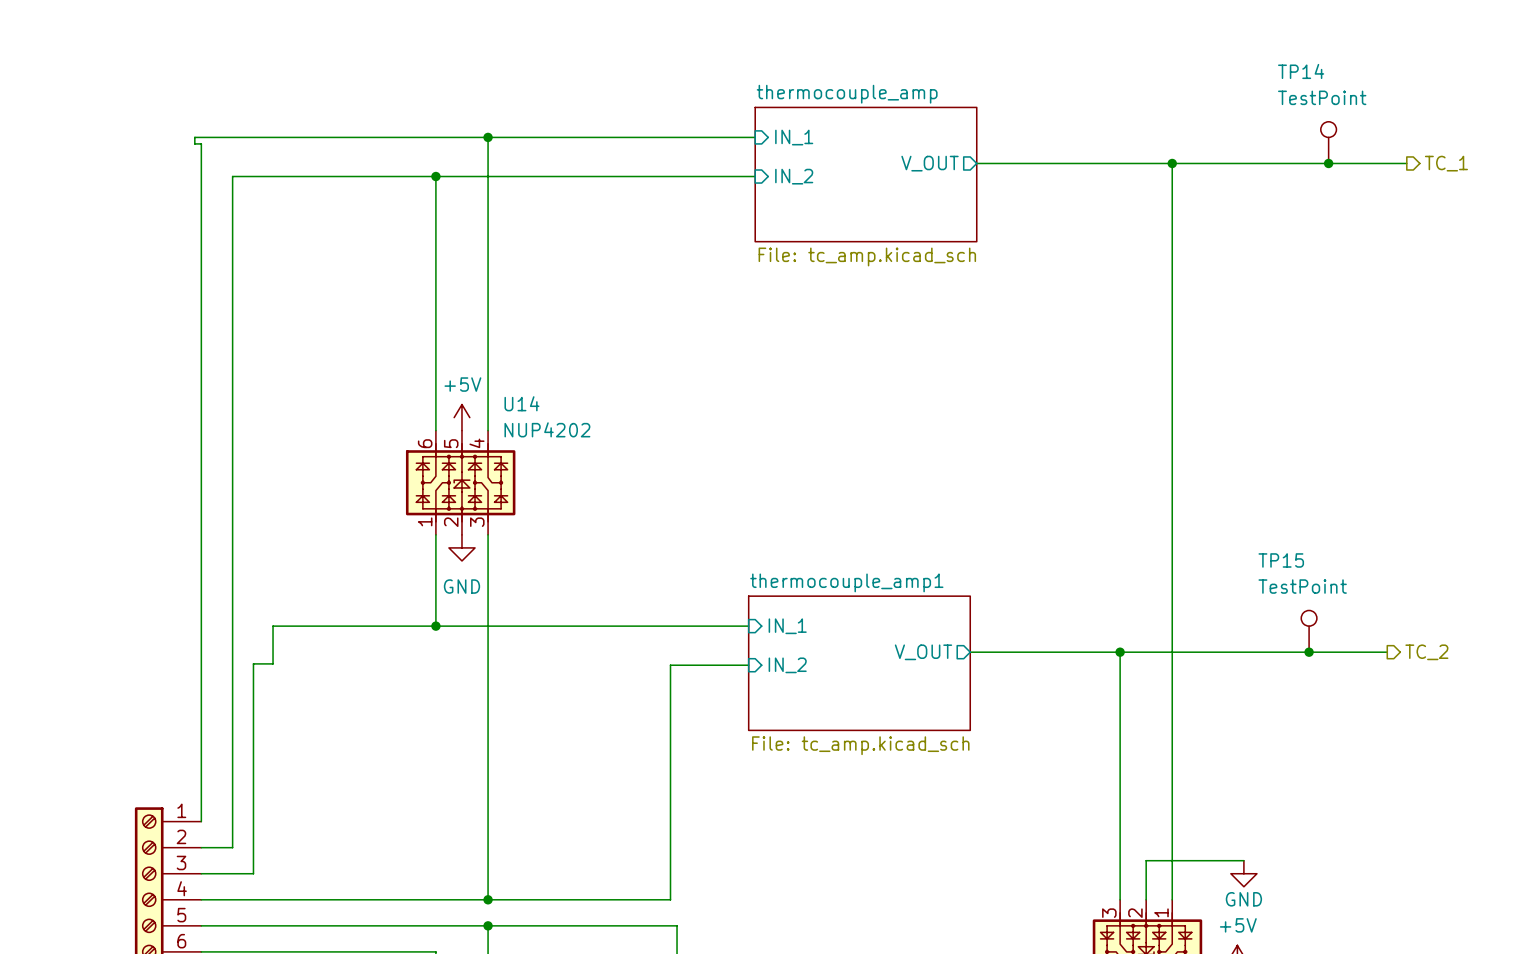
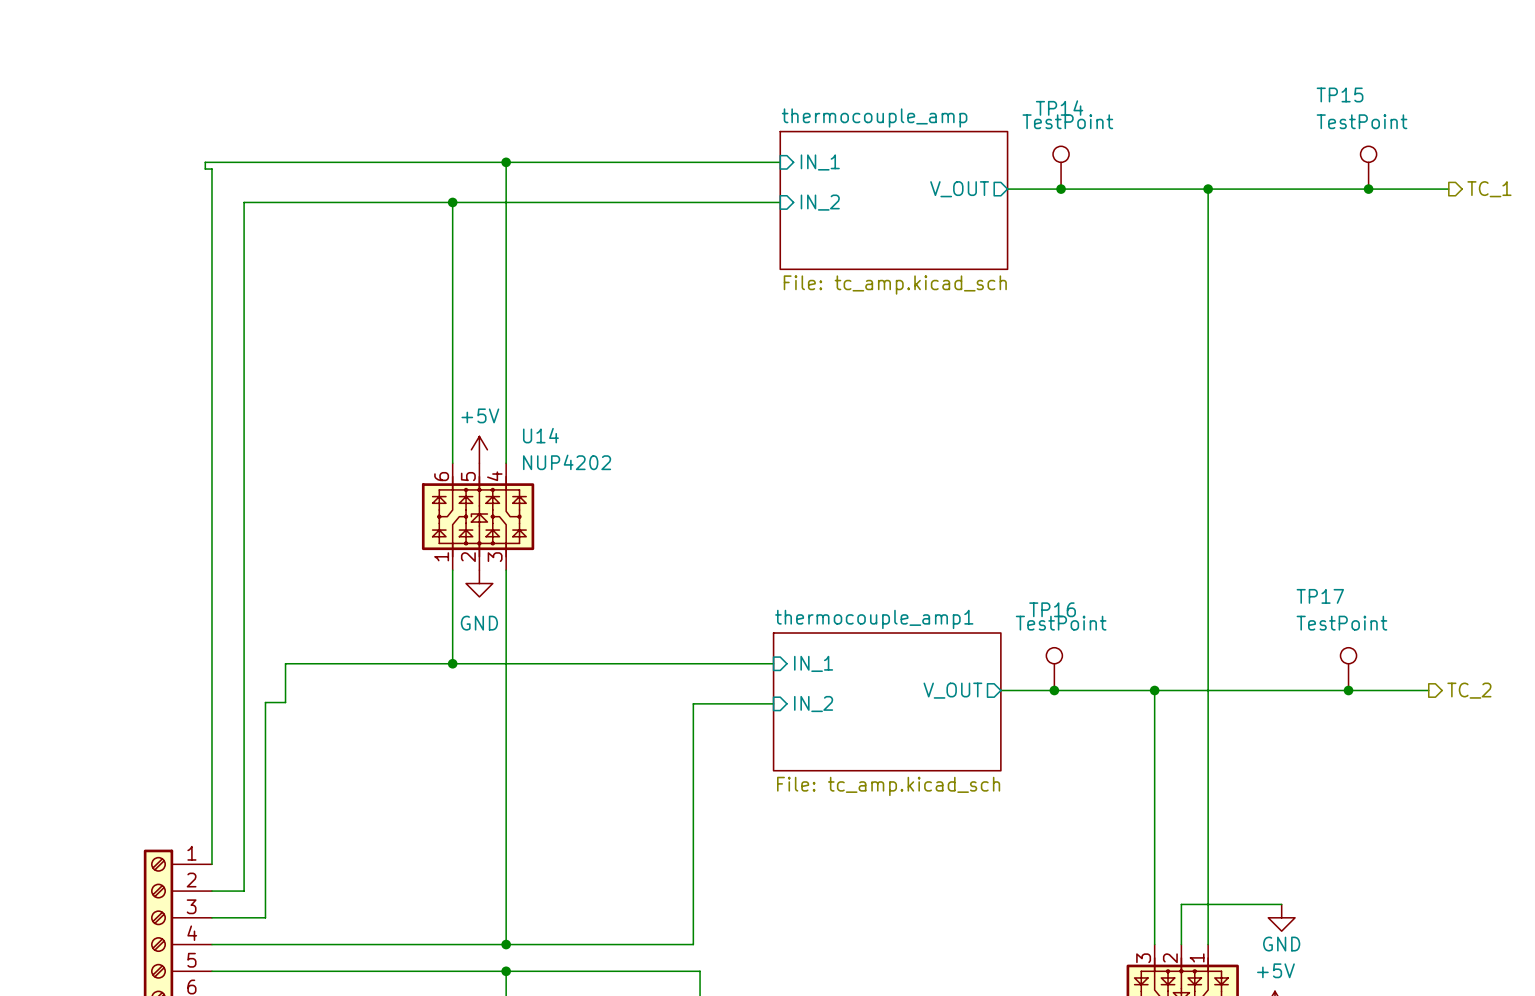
TP14 name: TP14 (1301, 71) -> TP15 (1340, 94)
TP14: none -> TestPoint (1061, 167)
junction: none -> (1061, 189)
TP15 name: TP15 (1281, 560) -> TP17 (1320, 596)
TP16: none -> TestPoint (1054, 669)
junction: none -> (1054, 690)

